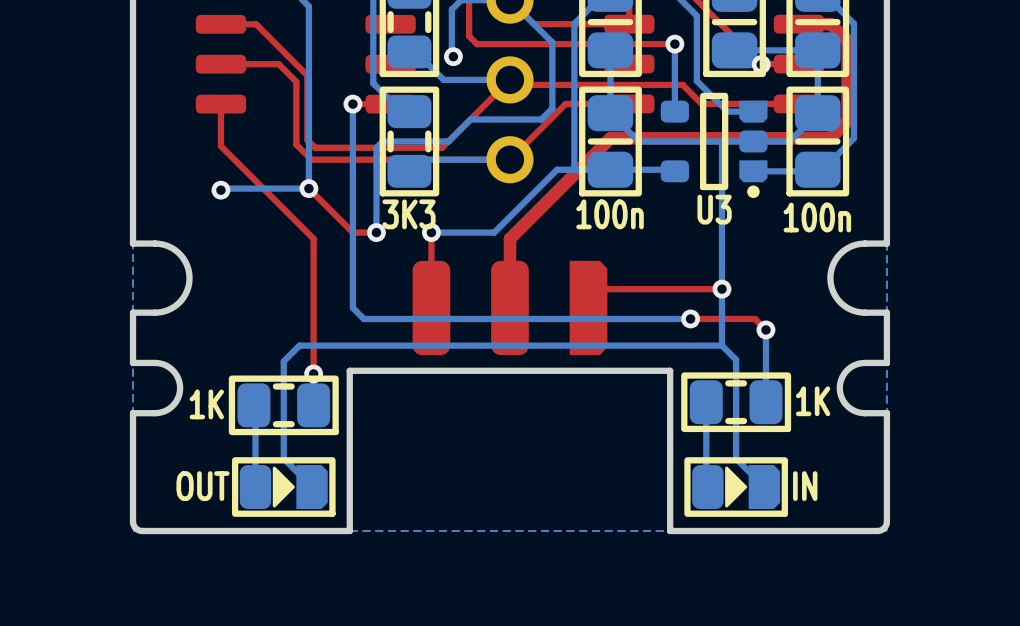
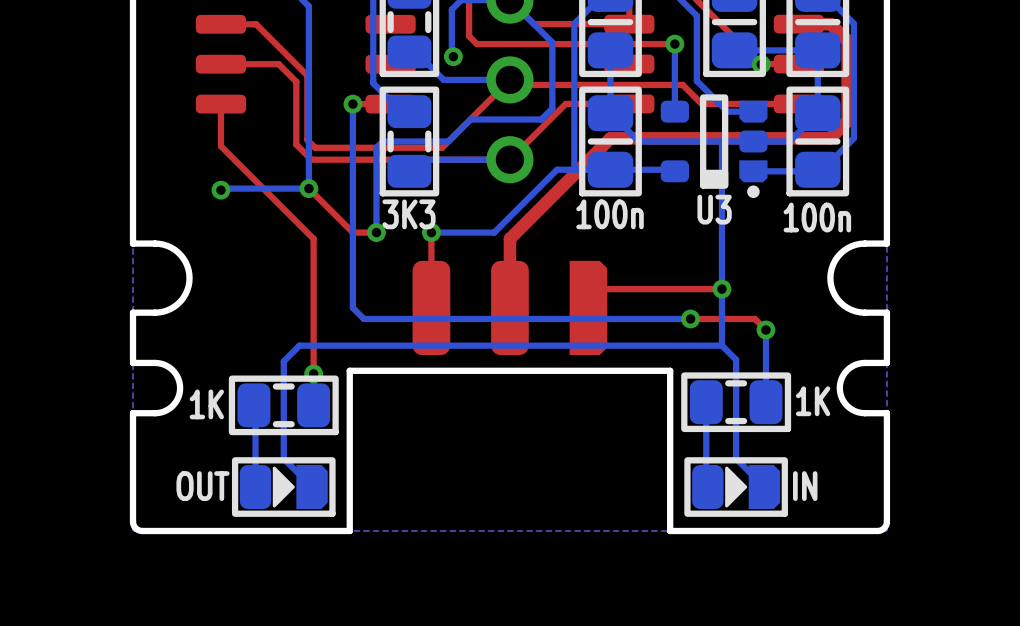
U3 footprint: [660, 92, 768, 199] -> [660, 94, 768, 199]

